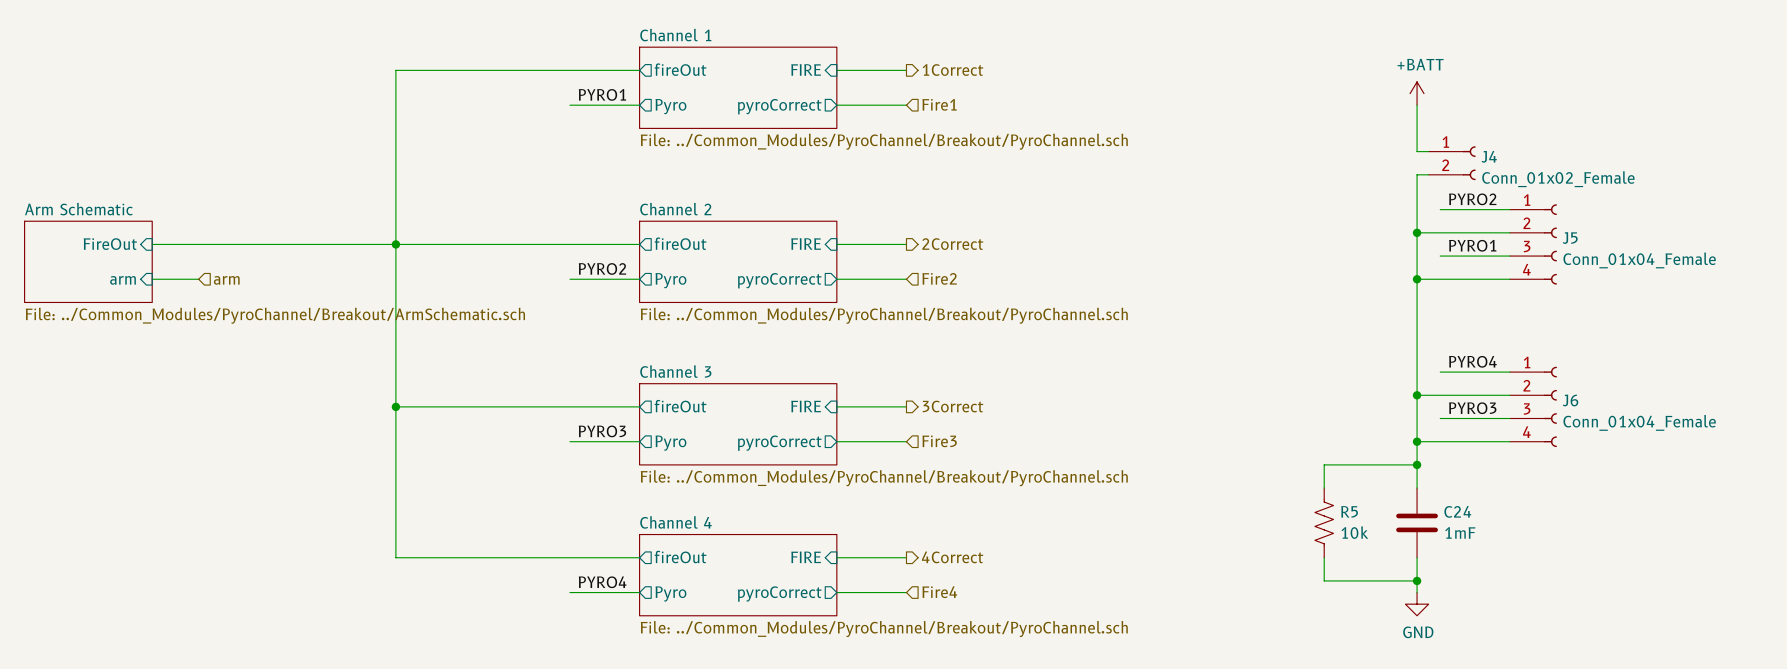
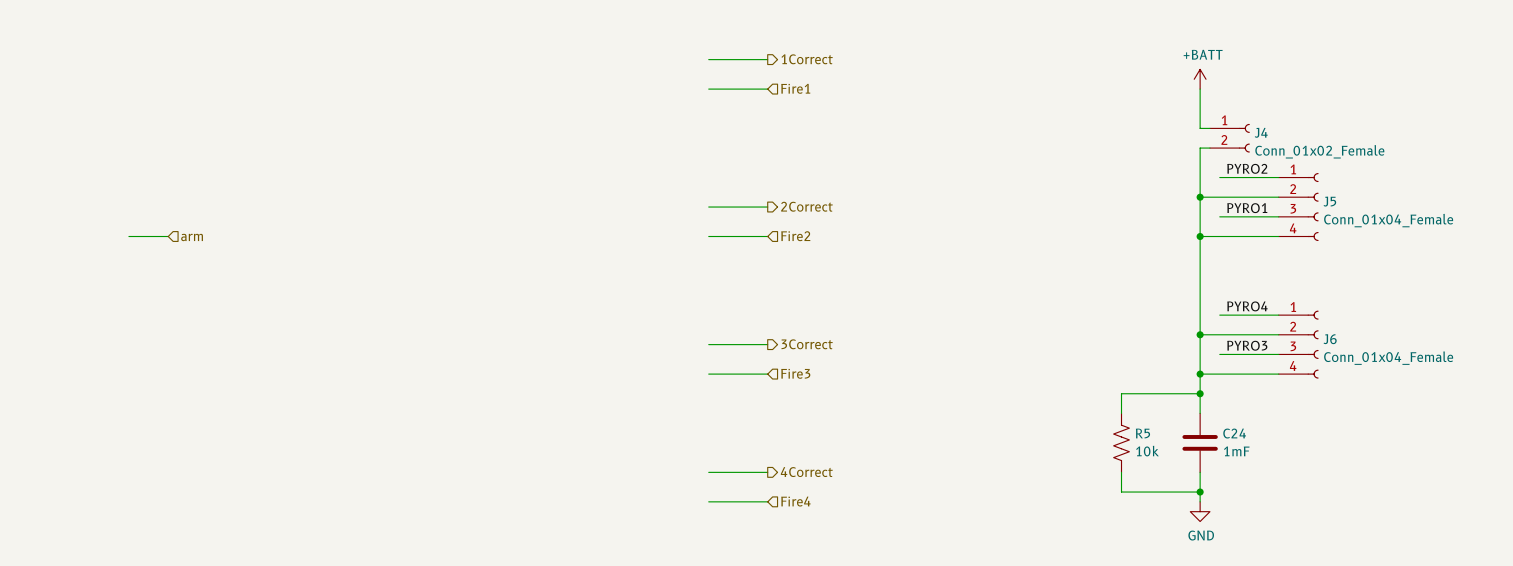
sheet pin: fireOut (680, 69) -> none
sheet pin: FIRE (806, 69) -> none
wire: (639, 70) (395, 70) (395, 557) (639, 557) -> none
sheet Channel 1: File: ../Common_Modules/PyroChannel/Breakout/PyroChannel.sch (738, 87) -> none
label: PYRO1 (602, 94) -> none
wire: (569, 105) (639, 105) -> none
sheet pin: Pyro (670, 106) -> none
sheet pin: pyroCorrect (779, 106) -> none
sheet pin: fireOut (680, 243) -> none
sheet pin: FireOut (110, 244) -> none
wire: (152, 244) (639, 244) -> none
junction: (395, 244) -> none
sheet pin: FIRE (806, 244) -> none
sheet Arm Schematic: File: ../Common_Modules/PyroChannel/Breakout/ArmSchematic.sch (88, 261) -> none
sheet Channel 2: File: ../Common_Modules/PyroChannel/Breakout/PyroChannel.sch (738, 261) -> none
label: PYRO2 (602, 268) -> none
wire: (569, 279) (639, 279) -> none
sheet pin: arm (123, 280) -> none
sheet pin: Pyro (670, 280) -> none
sheet pin: pyroCorrect (779, 280) -> none
wire: (395, 406) (639, 406) -> none
junction: (395, 406) -> none
sheet pin: fireOut (680, 406) -> none
sheet pin: FIRE (806, 406) -> none
sheet Channel 3: File: ../Common_Modules/PyroChannel/Breakout/PyroChannel.sch (738, 424) -> none
label: PYRO3 (602, 431) -> none
wire: (569, 441) (639, 441) -> none
sheet pin: Pyro (670, 443) -> none
sheet pin: pyroCorrect (779, 443) -> none
sheet pin: fireOut (680, 557) -> none
sheet pin: FIRE (806, 557) -> none
sheet Channel 4: File: ../Common_Modules/PyroChannel/Breakout/PyroChannel.sch (738, 575) -> none
label: PYRO4 (602, 582) -> none
wire: (569, 592) (639, 592) -> none
sheet pin: Pyro (670, 593) -> none
sheet pin: pyroCorrect (779, 594) -> none

